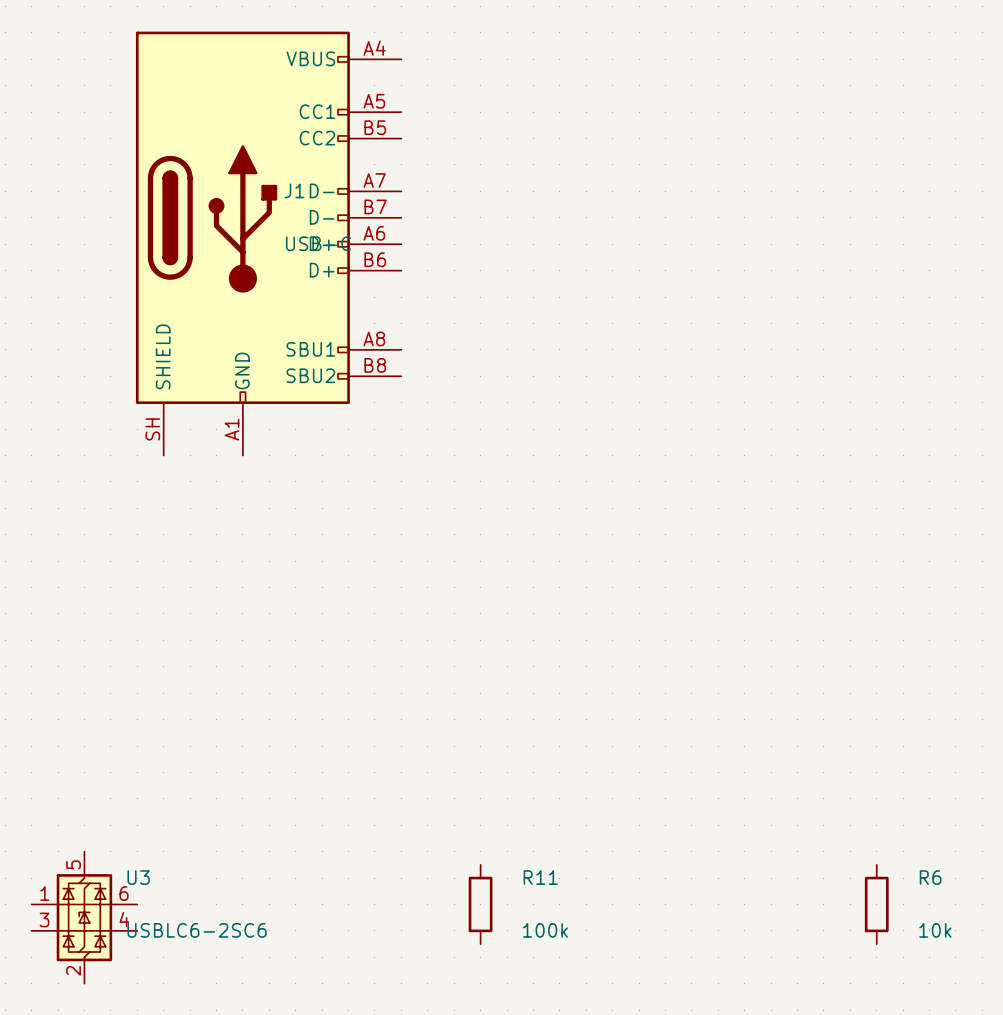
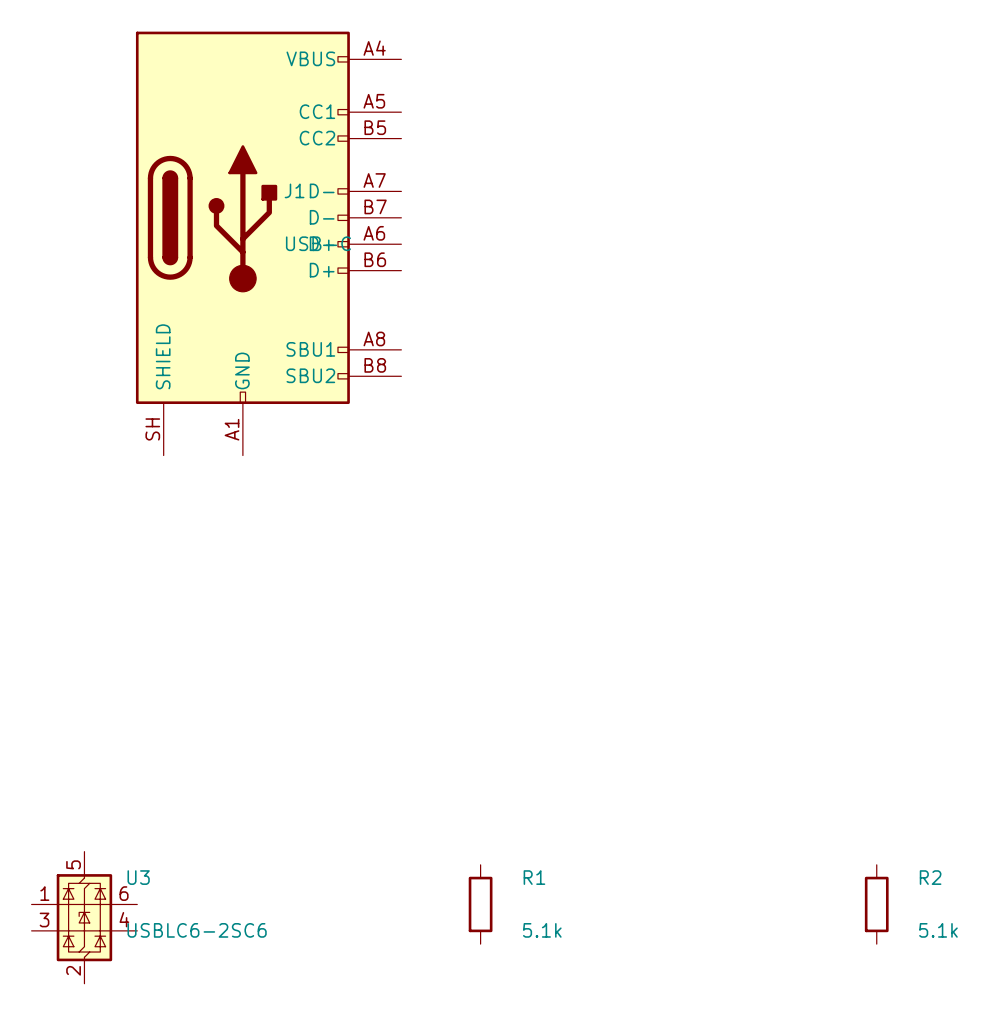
R11 name: R11 (540, 877) -> R1 (534, 877)
R6 name: R6 (930, 877) -> R2 (930, 877)
R11 value: 100k (545, 930) -> 5.1k (542, 930)
R6 value: 10k (935, 930) -> 5.1k (938, 930)

